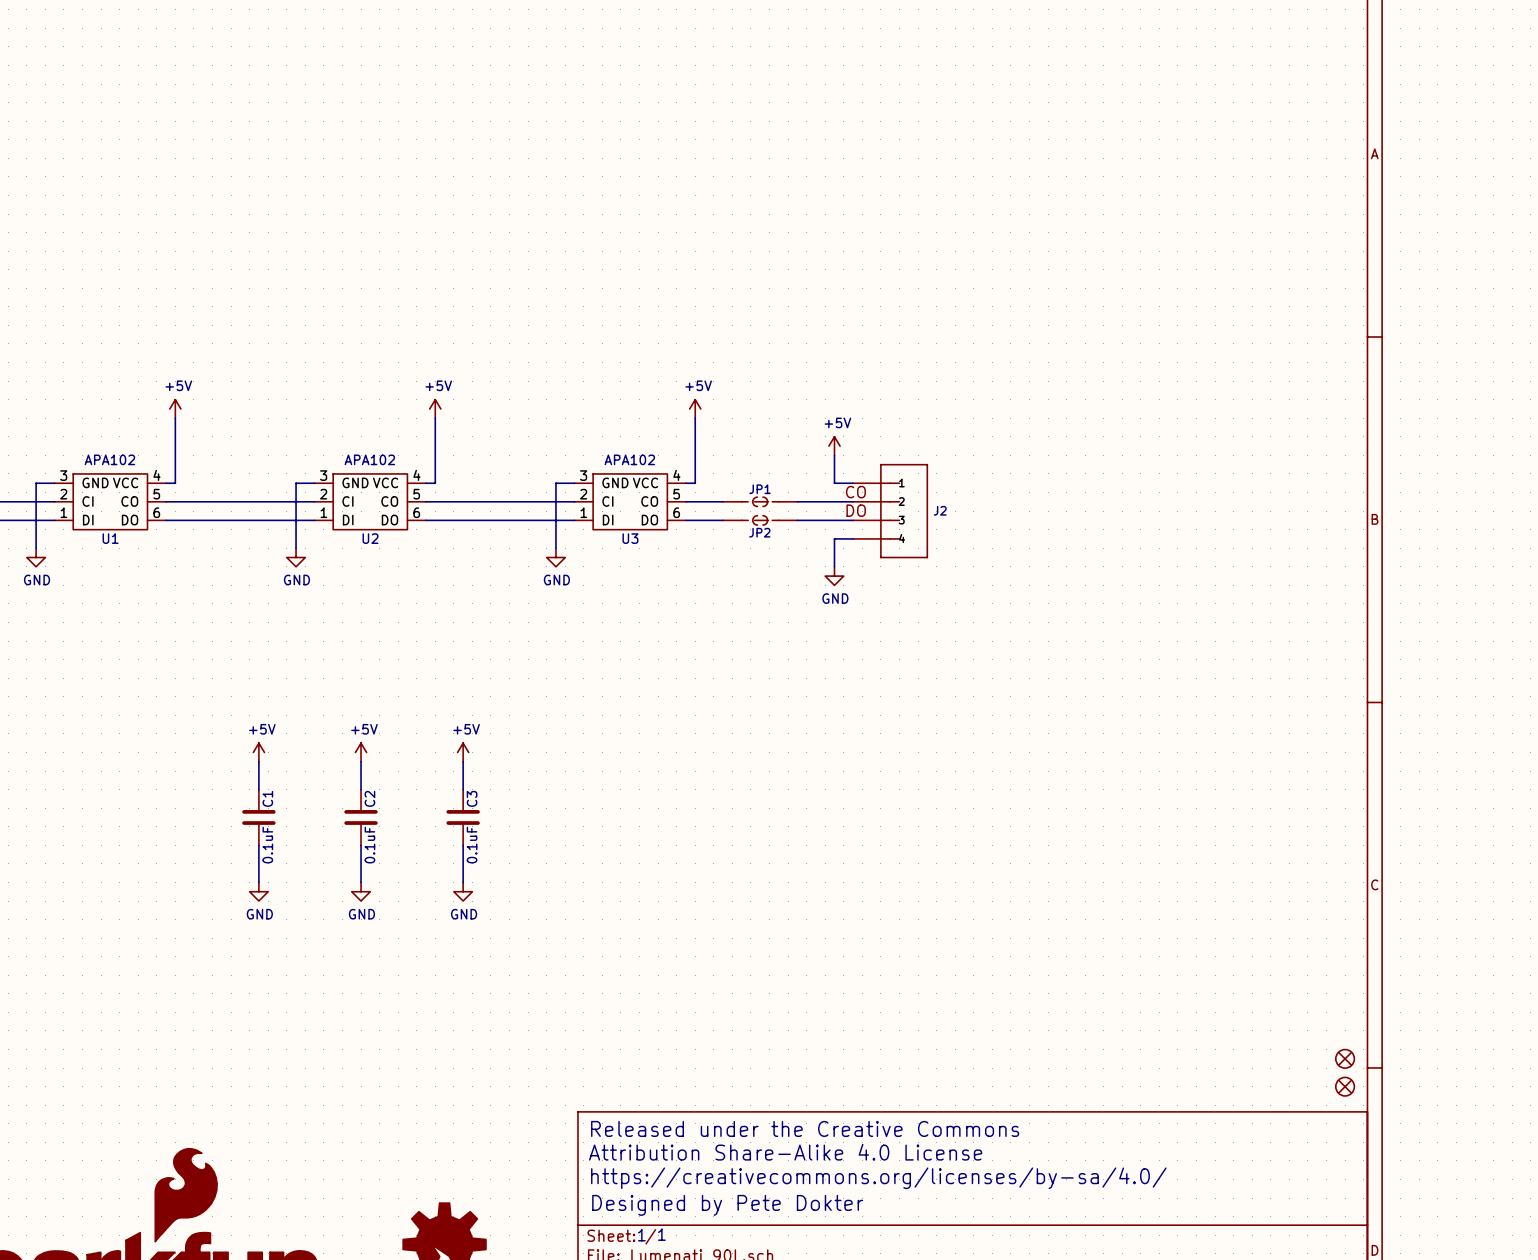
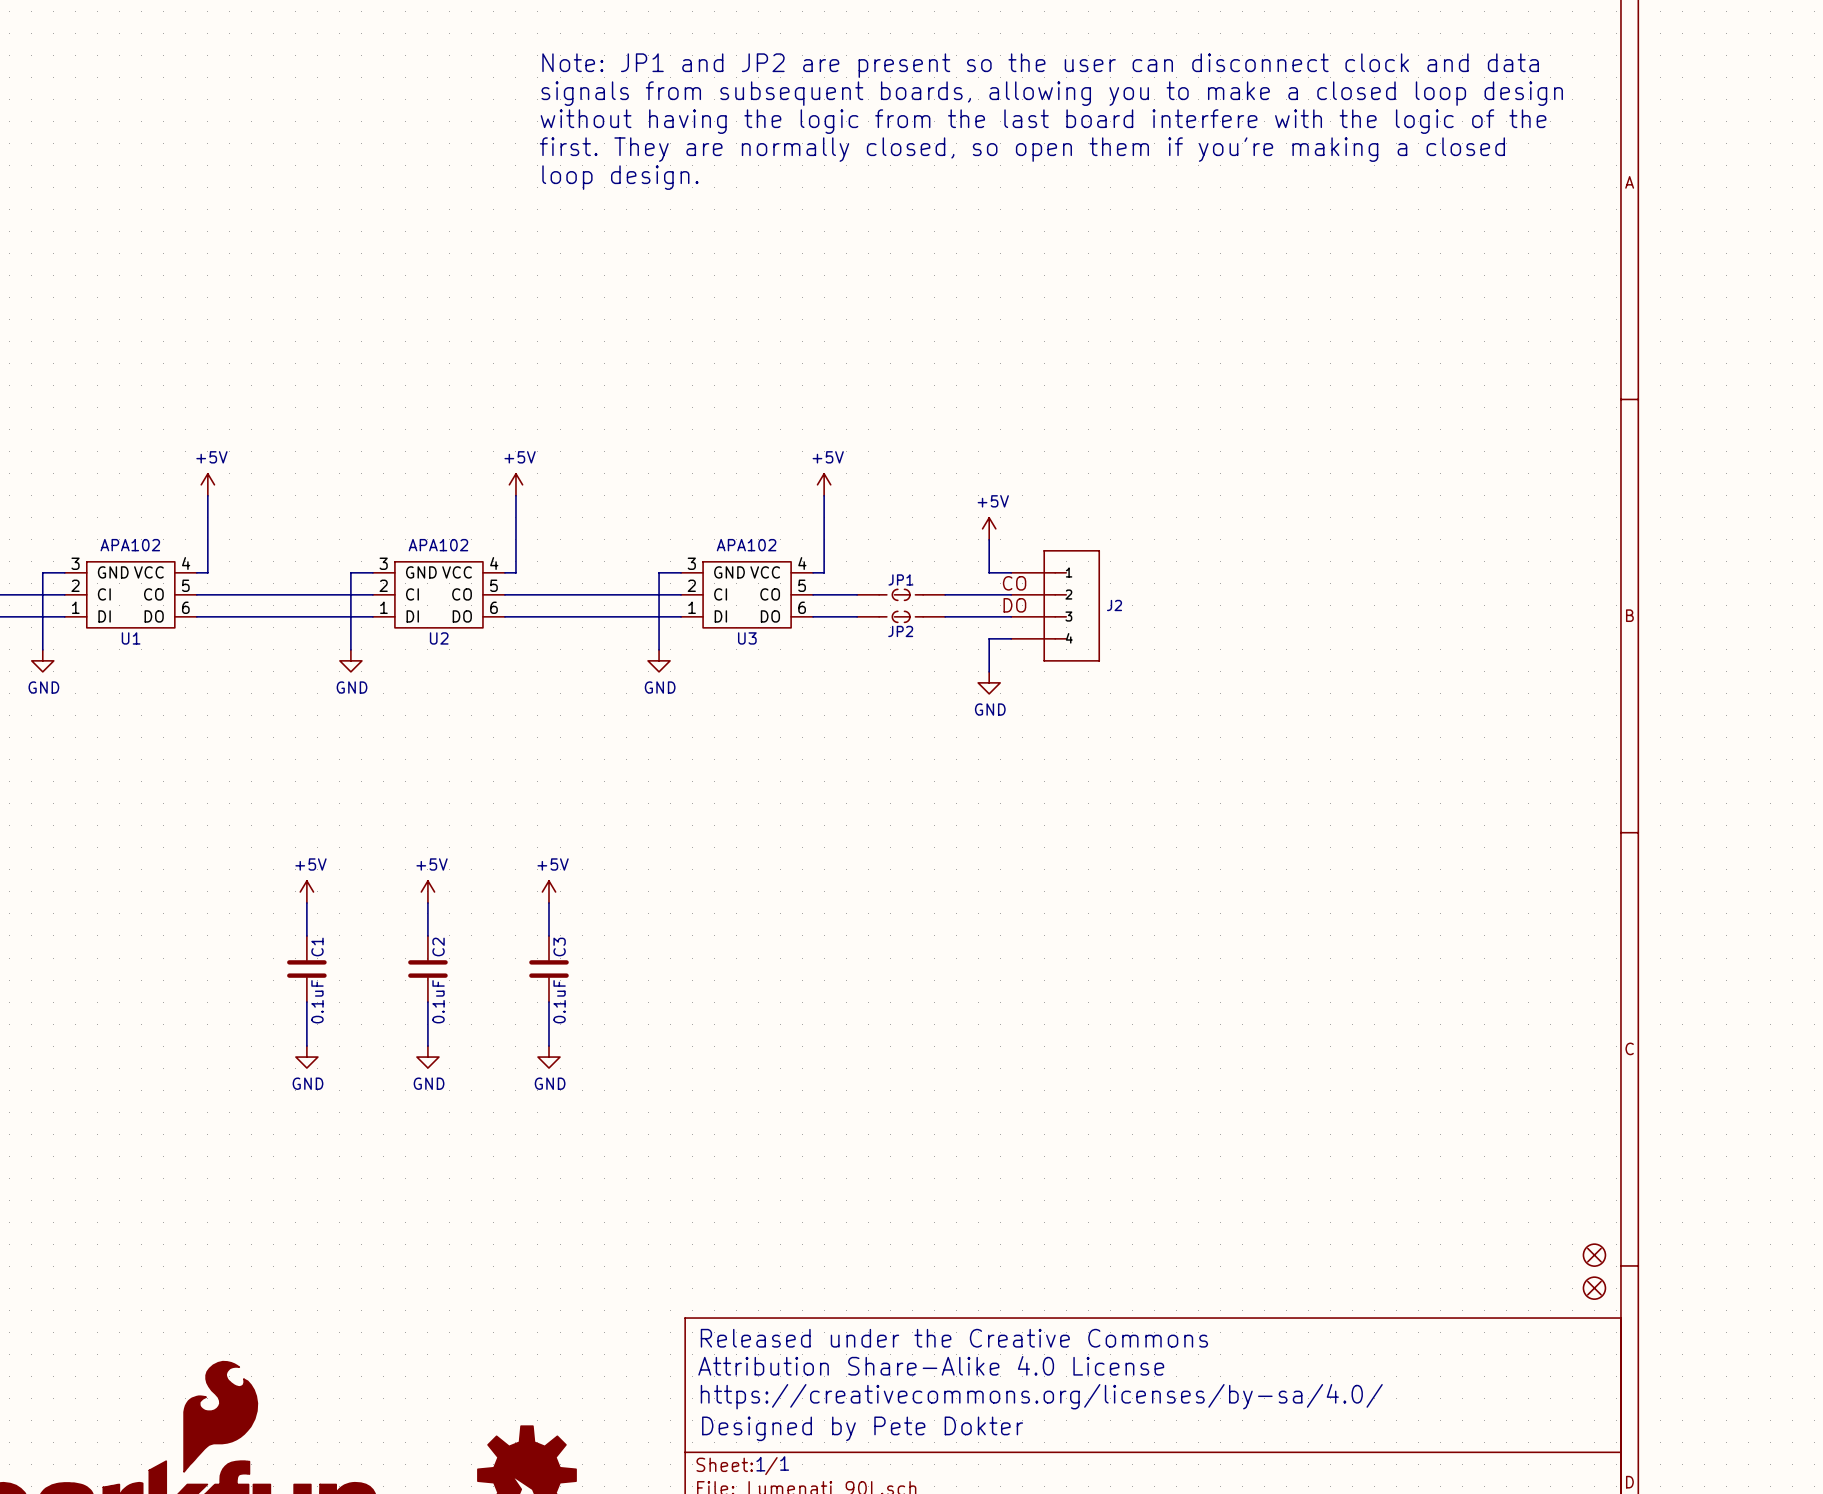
text: none -> Note: JP1 and JP2 are present so the user can disconnect clock and data (1040, 65)
text: none -> signals from subsequent boards, allowing you to make a closed loop design (1052, 93)
text: none -> without having the logic from the last board interfere with the logic of the (1043, 121)
text: none -> first. They are normally closed, so open them if you're making a closed (1022, 149)
text: none -> loop design. (620, 177)

